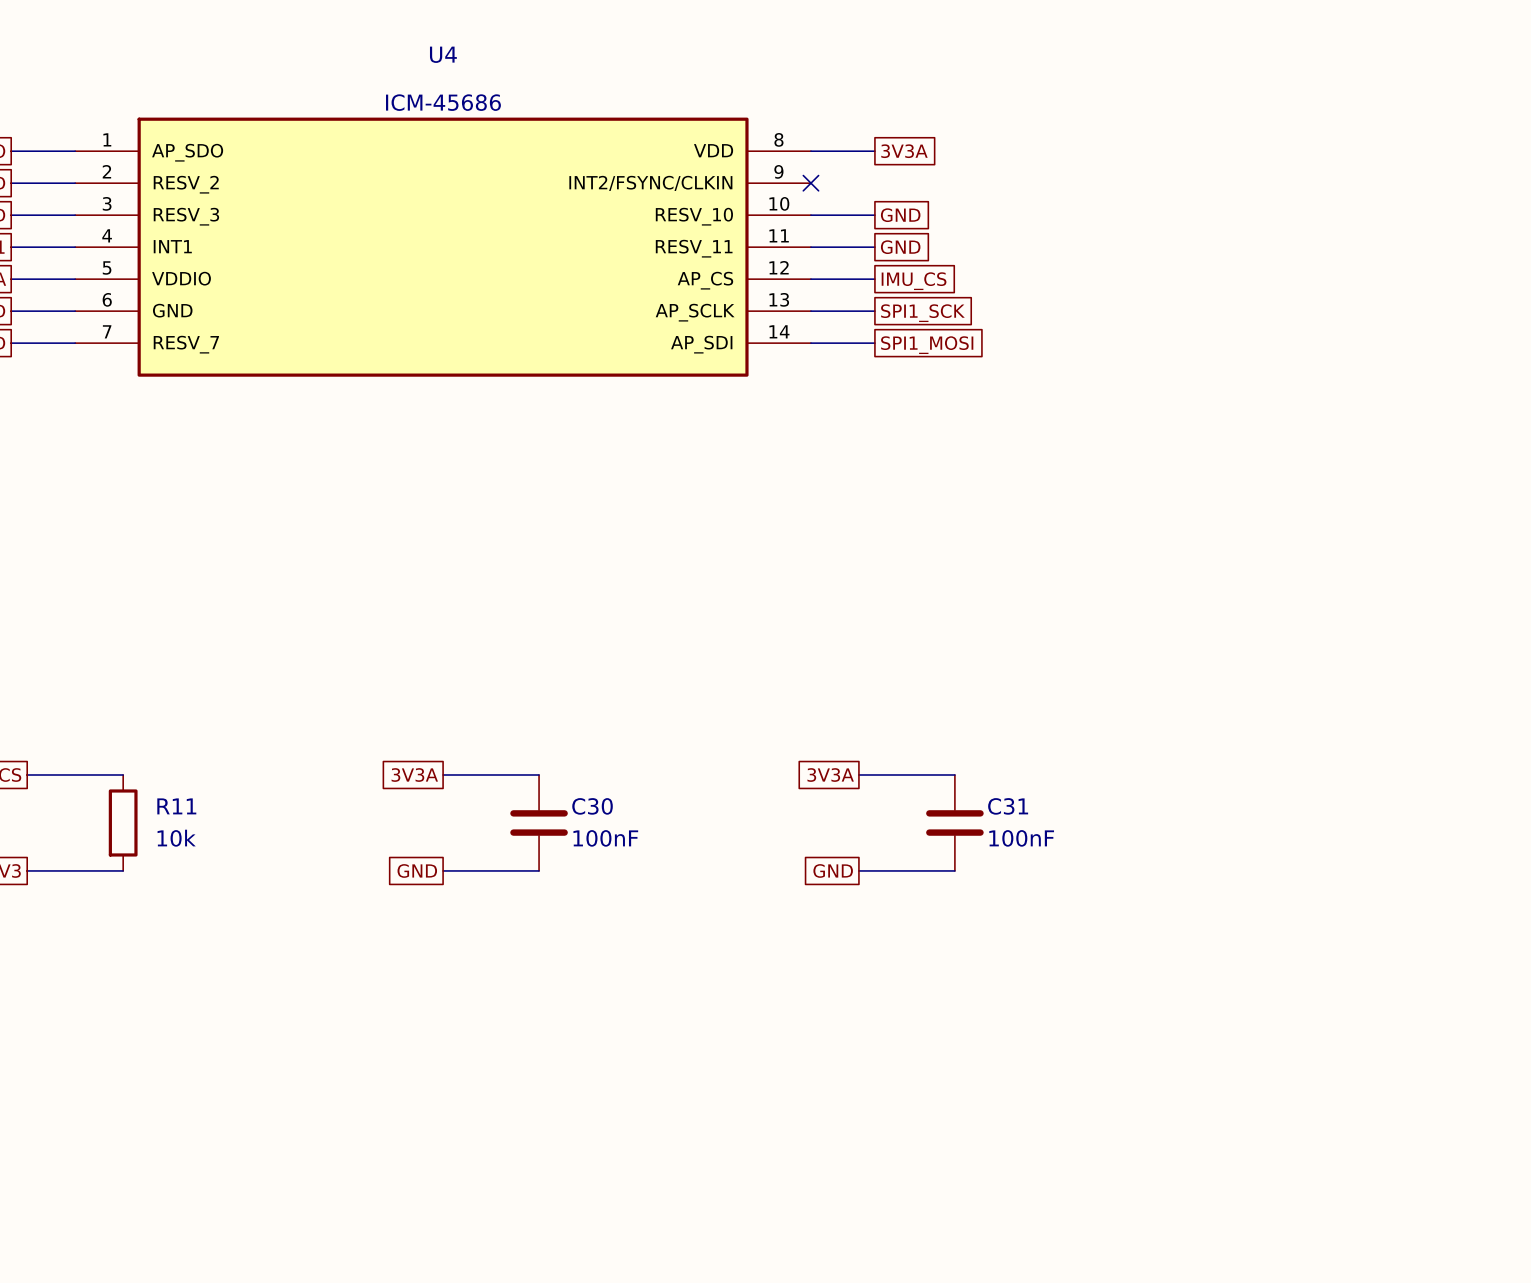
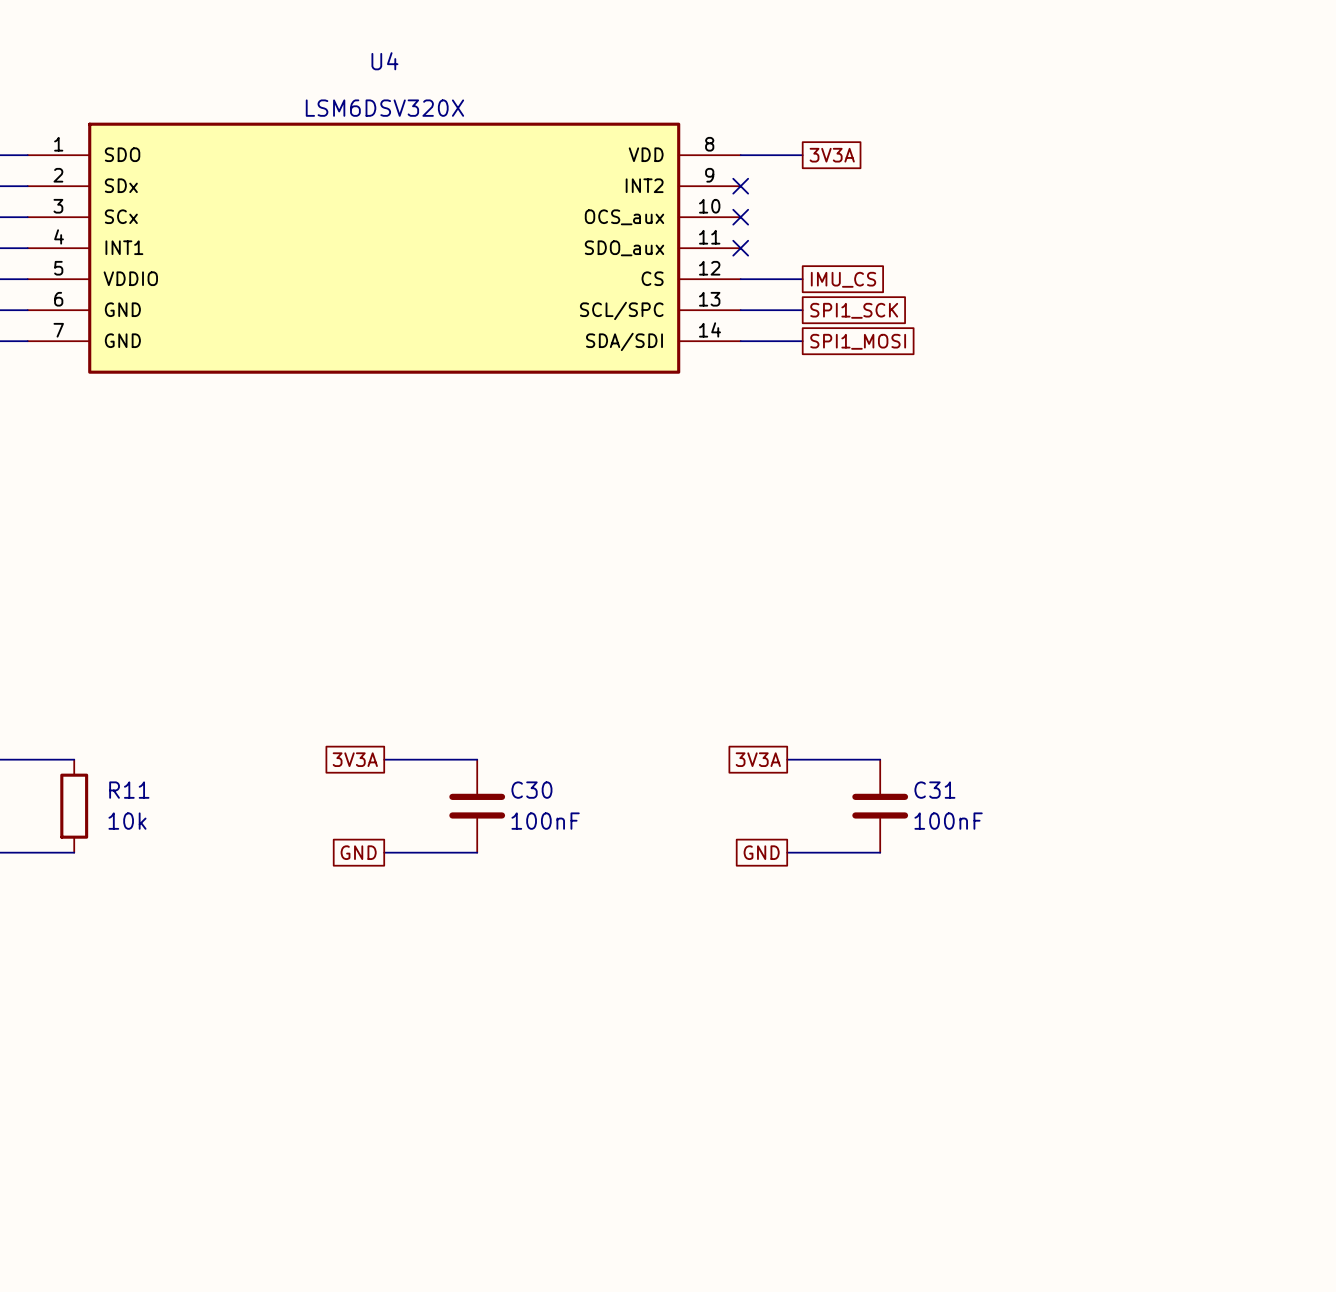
U4 value: ICM-45686 (443, 102) -> LSM6DSV320X (384, 108)
U4 symbol: [75, 117, 811, 377] -> [27, 122, 741, 374]
wire: (810, 215) (874, 215) -> none
no-connect mark: none -> (740, 217)
global label: GND (900, 215) -> none
wire: (810, 247) (874, 247) -> none
no-connect mark: none -> (740, 248)
global label: GND (900, 247) -> none

